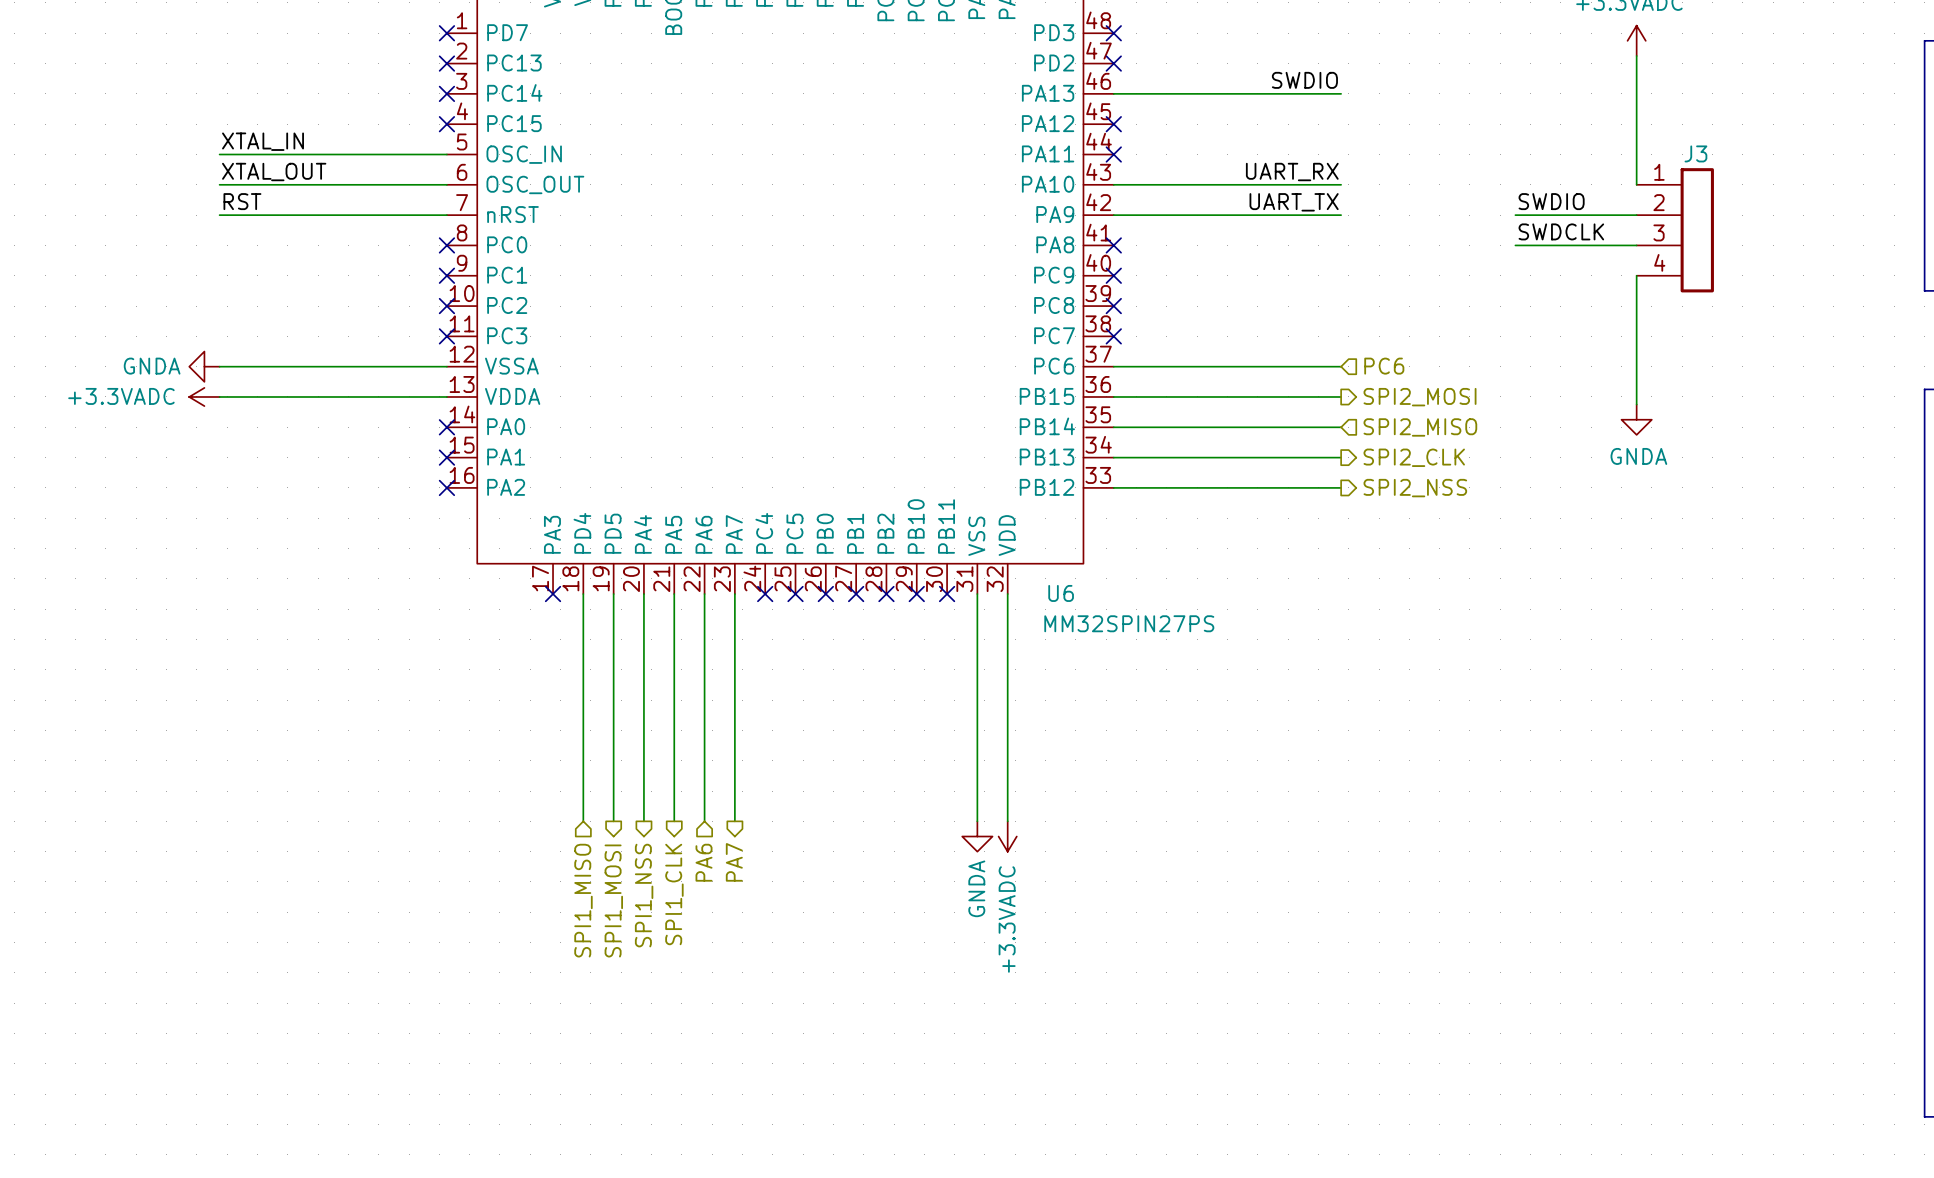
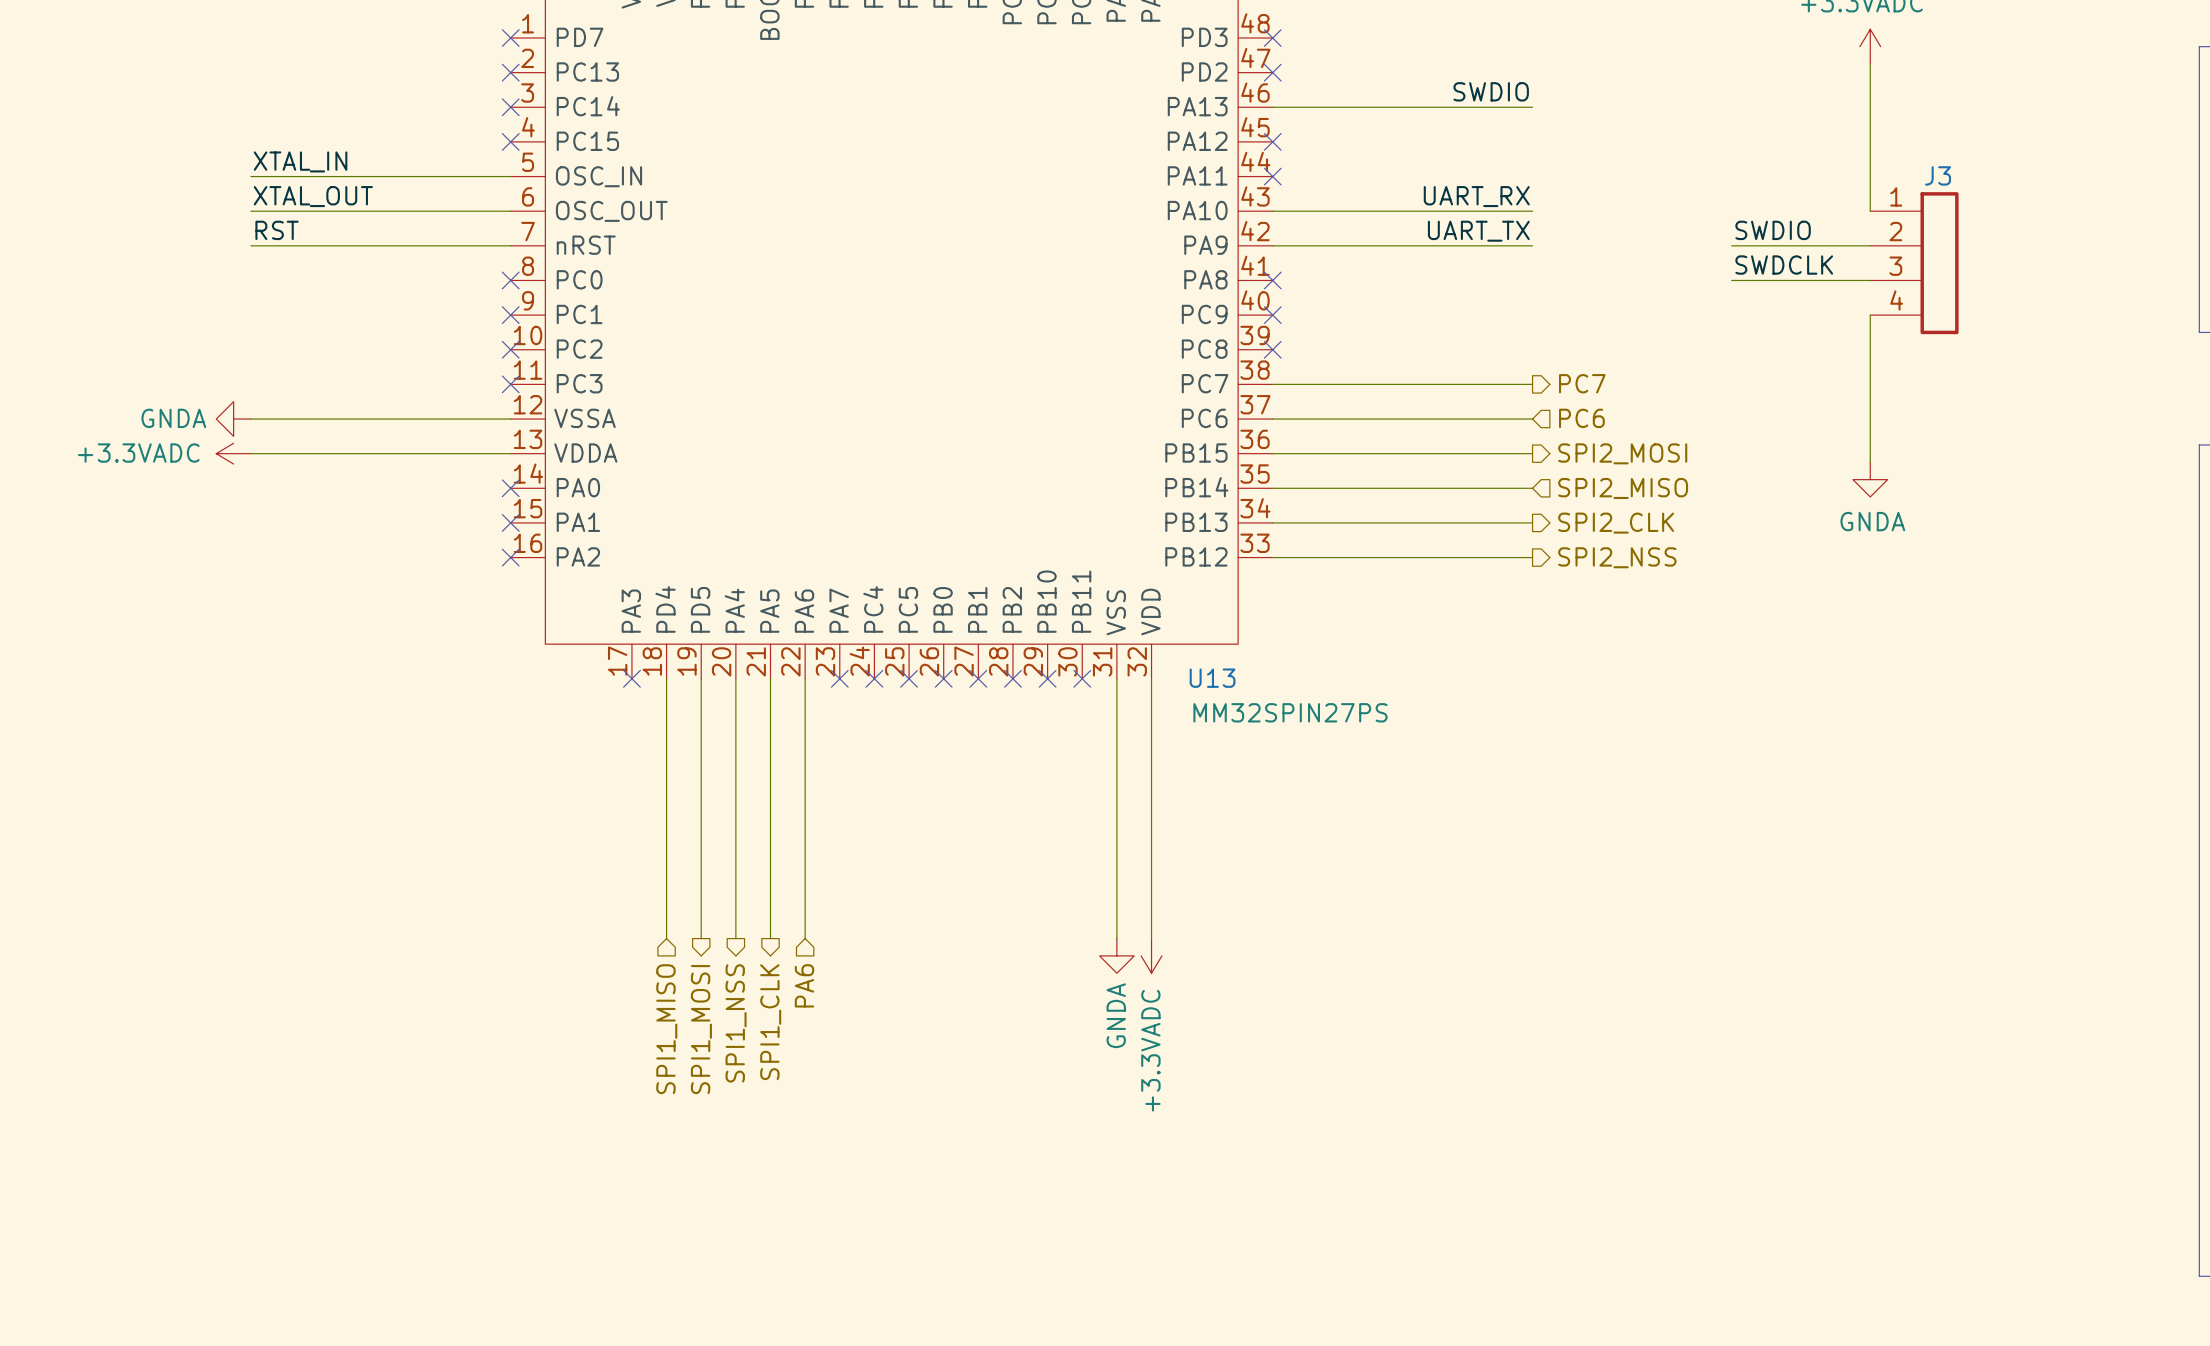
hierarchical label: none -> PC7 (1582, 383)
wire: none -> (1272, 384) (1532, 384)
no-connect mark: (1113, 336) -> none
U6 name: U6 (1061, 593) -> U13 (1212, 678)
wire: (734, 594) (734, 821) -> none
no-connect mark: none -> (839, 678)
hierarchical label: PA7 (734, 862) -> none

